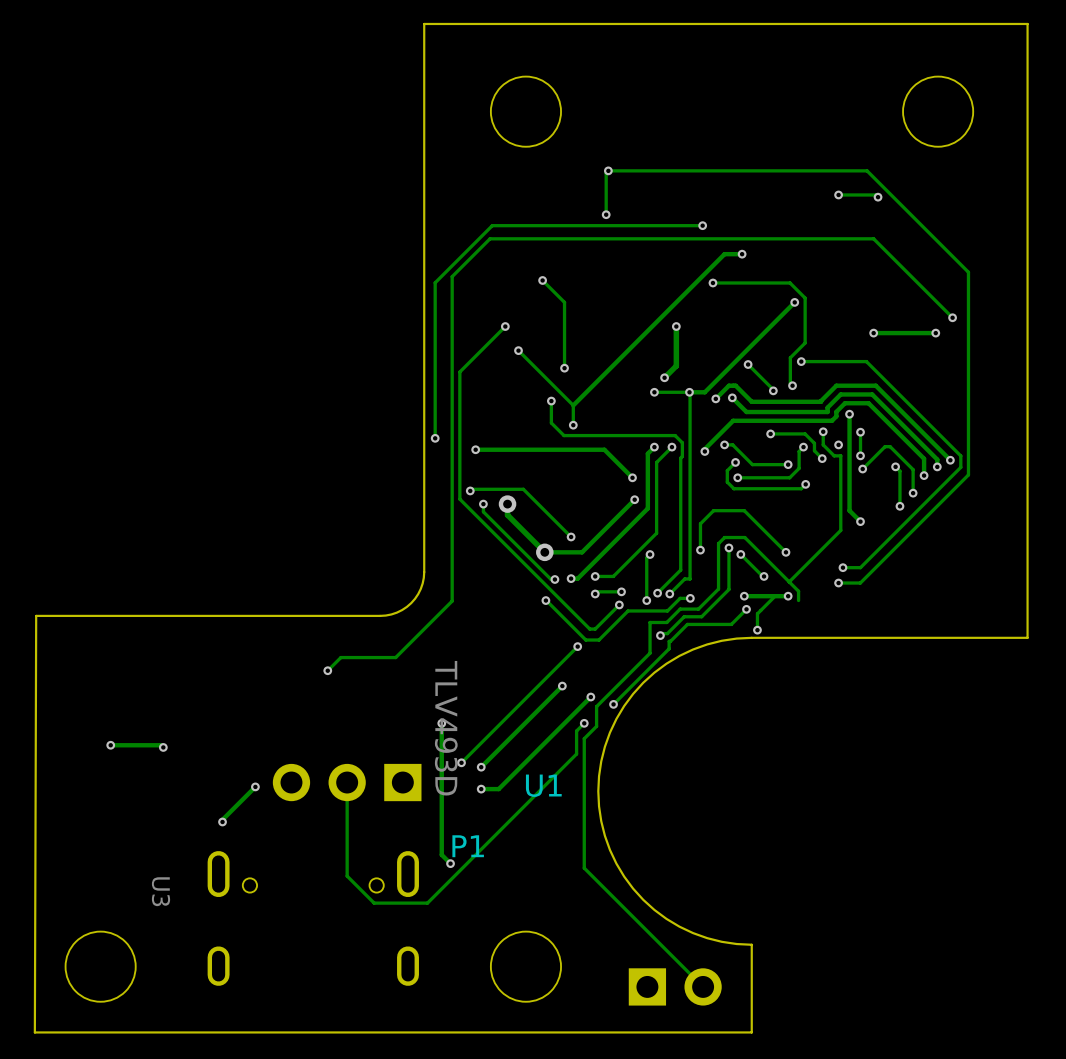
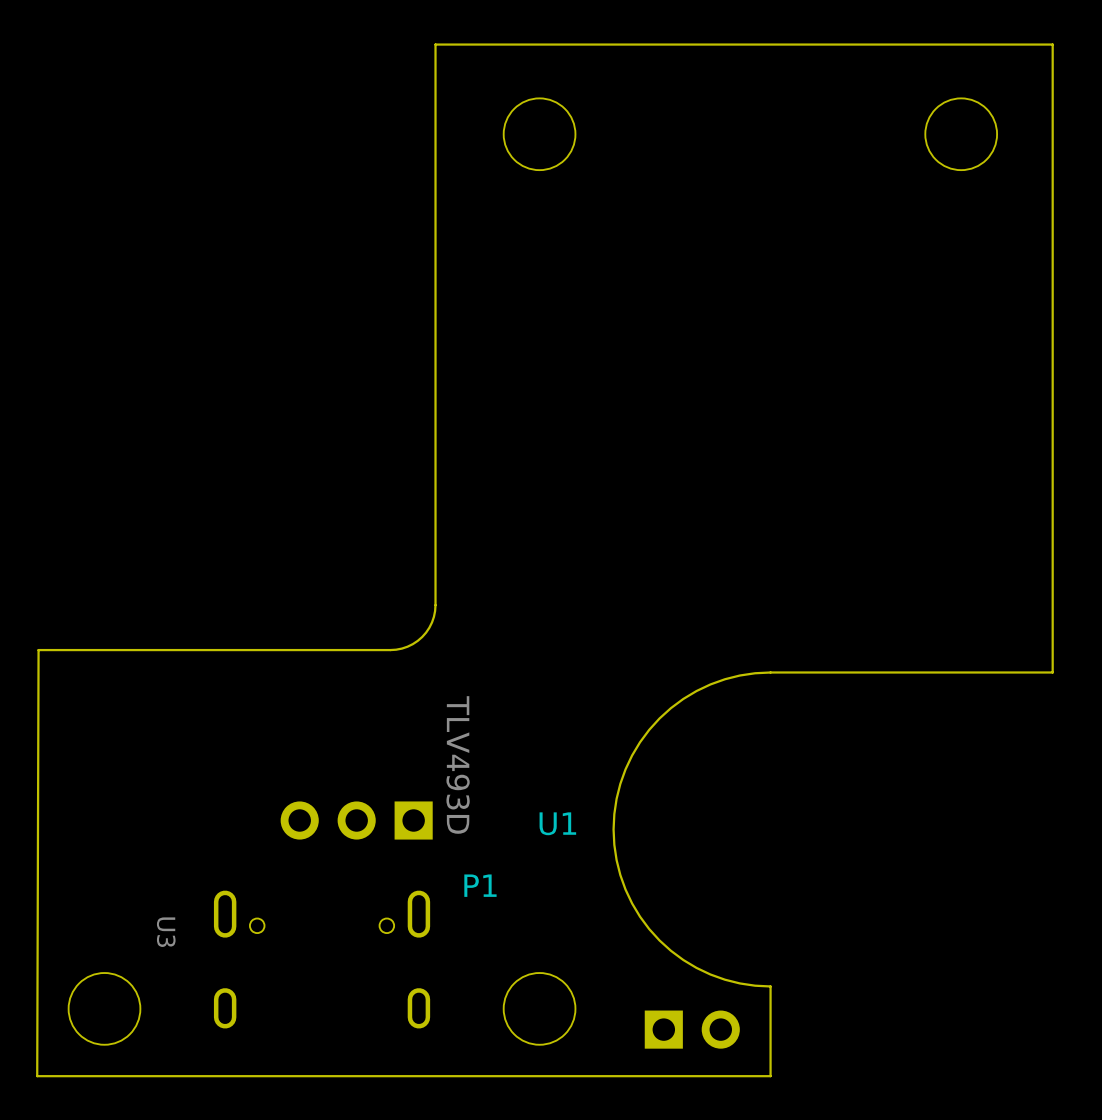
via: (608, 170) -> none
track: (838, 194) (875, 194) (878, 197) -> none
via: (838, 194) -> none
via: (878, 197) -> none
track: (606, 214) (606, 173) (608, 170) (867, 170) (968, 272) (968, 474) (860, 583) (838, 583) -> none
via: (606, 214) -> none
track: (702, 225) (492, 225) (435, 282) (435, 438) -> none
via: (702, 225) -> none
track: (742, 254) (724, 254) (573, 405) -> none
via: (742, 254) -> none
track: (542, 280) (564, 302) (564, 368) -> none
via: (542, 280) -> none
track: (712, 282) (790, 282) (805, 298) (805, 343) (790, 357) (790, 383) (792, 385) -> none
via: (712, 282) -> none
track: (794, 302) (704, 392) (689, 392) -> none
via: (794, 302) -> none
track: (952, 317) (873, 238) (490, 238) (452, 276) (452, 601) (395, 657) (340, 657) (327, 670) -> none
via: (952, 317) -> none
track: (505, 326) (459, 372) (459, 499) (589, 629) (595, 629) (619, 604) -> none
via: (505, 326) -> none
track: (676, 326) (676, 365) (664, 377) -> none
via: (676, 326) -> none
via: (873, 333) -> none
track: (935, 333) (873, 333) -> none
via: (935, 333) -> none
track: (518, 350) (573, 405) -> none
via: (518, 350) -> none
track: (801, 361) (866, 361) (960, 455) (960, 467) (860, 567) (842, 567) -> none
via: (801, 361) -> none
track: (748, 364) (773, 390) -> none
via: (748, 364) -> none
via: (564, 368) -> none
via: (664, 377) -> none
via: (792, 385) -> none
via: (773, 390) -> none
via: (654, 392) -> none
track: (689, 392) (690, 578) (684, 578) (669, 593) -> none
track: (689, 392) (654, 392) -> none
via: (689, 392) -> none
track: (732, 397) (746, 412) (827, 412) (827, 407) (840, 394) (872, 394) (937, 459) (937, 466) -> none
via: (732, 397) -> none
track: (715, 398) (728, 385) (735, 385) (751, 401) (821, 401) (836, 385) (875, 385) (950, 460) -> none
via: (715, 398) -> none
track: (551, 401) (551, 422) (563, 435) (675, 435) (682, 442) (680, 570) (657, 593) -> none
via: (551, 401) -> none
track: (573, 405) (573, 425) -> none
track: (849, 414) (849, 510) (860, 521) -> none
via: (849, 414) -> none
via: (573, 425) -> none
track: (823, 431) (823, 444) (834, 455) (840, 455) (840, 530) (789, 581) -> none
via: (823, 431) -> none
track: (860, 432) (860, 455) -> none
via: (860, 432) -> none
track: (770, 433) (805, 433) (814, 443) (814, 450) (822, 458) -> none
via: (770, 433) -> none
via: (435, 438) -> none
track: (724, 444) (732, 444) (752, 464) (788, 464) -> none
via: (724, 444) -> none
via: (838, 444) -> none
track: (654, 447) (647, 453) (647, 508) (577, 578) (571, 578) -> none
via: (654, 447) -> none
track: (671, 447) (656, 462) (656, 533) (613, 576) (595, 576) -> none
via: (671, 447) -> none
track: (803, 447) (799, 451) (799, 468) (789, 477) (737, 477) -> none
via: (803, 447) -> none
track: (475, 449) (604, 449) (632, 477) -> none
via: (475, 449) -> none
track: (704, 451) (704, 449) (733, 420) (832, 420) (836, 416) (836, 411) (845, 403) (868, 403) (924, 458) (924, 475) -> none
via: (704, 451) -> none
via: (860, 455) -> none
via: (822, 458) -> none
via: (950, 460) -> none
track: (735, 462) (727, 470) (727, 482) (733, 488) (801, 488) (805, 484) -> none
via: (735, 462) -> none
via: (788, 464) -> none
track: (895, 466) (899, 471) (899, 506) -> none
via: (895, 466) -> none
via: (937, 466) -> none
track: (862, 469) (885, 446) (890, 446) (913, 469) (913, 493) -> none
via: (862, 469) -> none
via: (924, 475) -> none
via: (632, 477) -> none
via: (737, 477) -> none
via: (805, 484) -> none
track: (470, 490) (471, 489) (523, 489) (571, 536) -> none
via: (470, 490) -> none
via: (913, 493) -> none
track: (634, 499) (582, 552) (544, 552) (507, 515) (507, 504) -> none
via: (634, 499) -> none
track: (483, 504) (483, 511) (551, 579) (554, 579) -> none
via: (483, 504) -> none
via: (507, 504) -> none
via: (899, 506) -> none
via: (860, 521) -> none
via: (571, 536) -> none
track: (728, 547) (728, 589) (701, 616) (684, 616) (667, 633) (660, 635) -> none
via: (728, 547) -> none
track: (700, 550) (700, 523) (713, 510) (744, 510) (785, 552) -> none
via: (700, 550) -> none
via: (544, 552) -> none
via: (785, 552) -> none
track: (650, 554) (646, 557) (646, 600) -> none
via: (650, 554) -> none
track: (740, 554) (764, 576) -> none
via: (740, 554) -> none
via: (842, 567) -> none
via: (595, 576) -> none
via: (764, 576) -> none
via: (571, 578) -> none
via: (554, 579) -> none
via: (838, 583) -> none
track: (621, 591) (597, 591) (595, 593) -> none
via: (621, 591) -> none
via: (595, 593) -> none
via: (657, 593) -> none
via: (669, 593) -> none
track: (744, 596) (788, 596) (775, 596) (757, 613) (757, 630) -> none
via: (744, 596) -> none
via: (788, 596) -> none
track: (690, 598) (680, 598) (667, 610) (628, 610) (598, 640) (585, 640) (545, 600) -> none
via: (690, 598) -> none
via: (545, 600) -> none
via: (646, 600) -> none
track: (798, 600) (798, 591) (744, 537) (724, 537) (718, 543) (718, 589) (698, 609) (680, 609) (666, 622) (650, 622) (650, 653) (596, 706) (596, 726) (584, 738) (584, 868) (703, 986) -> none
via: (619, 604) -> none
track: (746, 609) (731, 624) (687, 624) (669, 641) -> none
via: (746, 609) -> none
via: (757, 630) -> none
via: (660, 635) -> none
track: (669, 641) (669, 648) (613, 704) -> none
track: (577, 646) (461, 762) -> none
via: (577, 646) -> none
via: (327, 670) -> none
track: (562, 686) (481, 767) -> none
via: (562, 686) -> none
track: (590, 697) (498, 789) (481, 789) -> none
via: (590, 697) -> none
via: (613, 704) -> none
track: (441, 723) (441, 854) (450, 863) -> none
via: (441, 723) -> none
track: (584, 723) (576, 731) (576, 754) (427, 903) (374, 903) (347, 876) (347, 782) -> none
via: (584, 723) -> none
track: (110, 745) (161, 745) (163, 747) -> none
via: (110, 745) -> none
via: (163, 747) -> none
via: (461, 762) -> none
via: (481, 767) -> none
track: (255, 786) (222, 821) -> none
via: (255, 786) -> none
via: (481, 789) -> none
via: (222, 821) -> none
via: (450, 863) -> none

